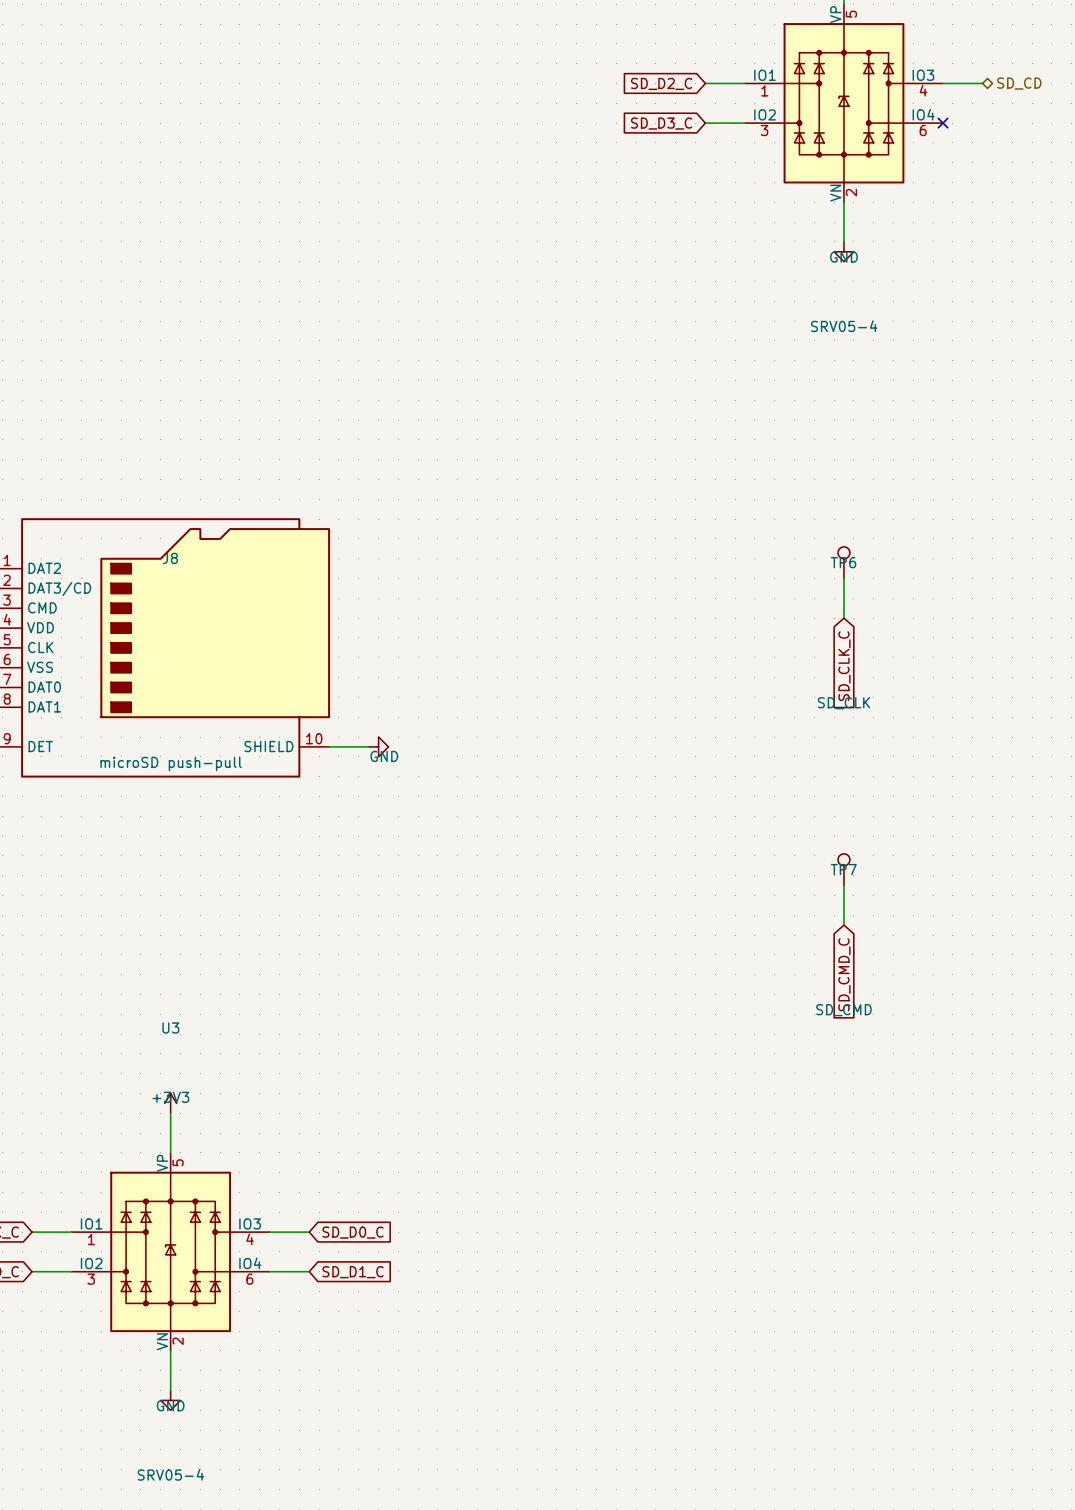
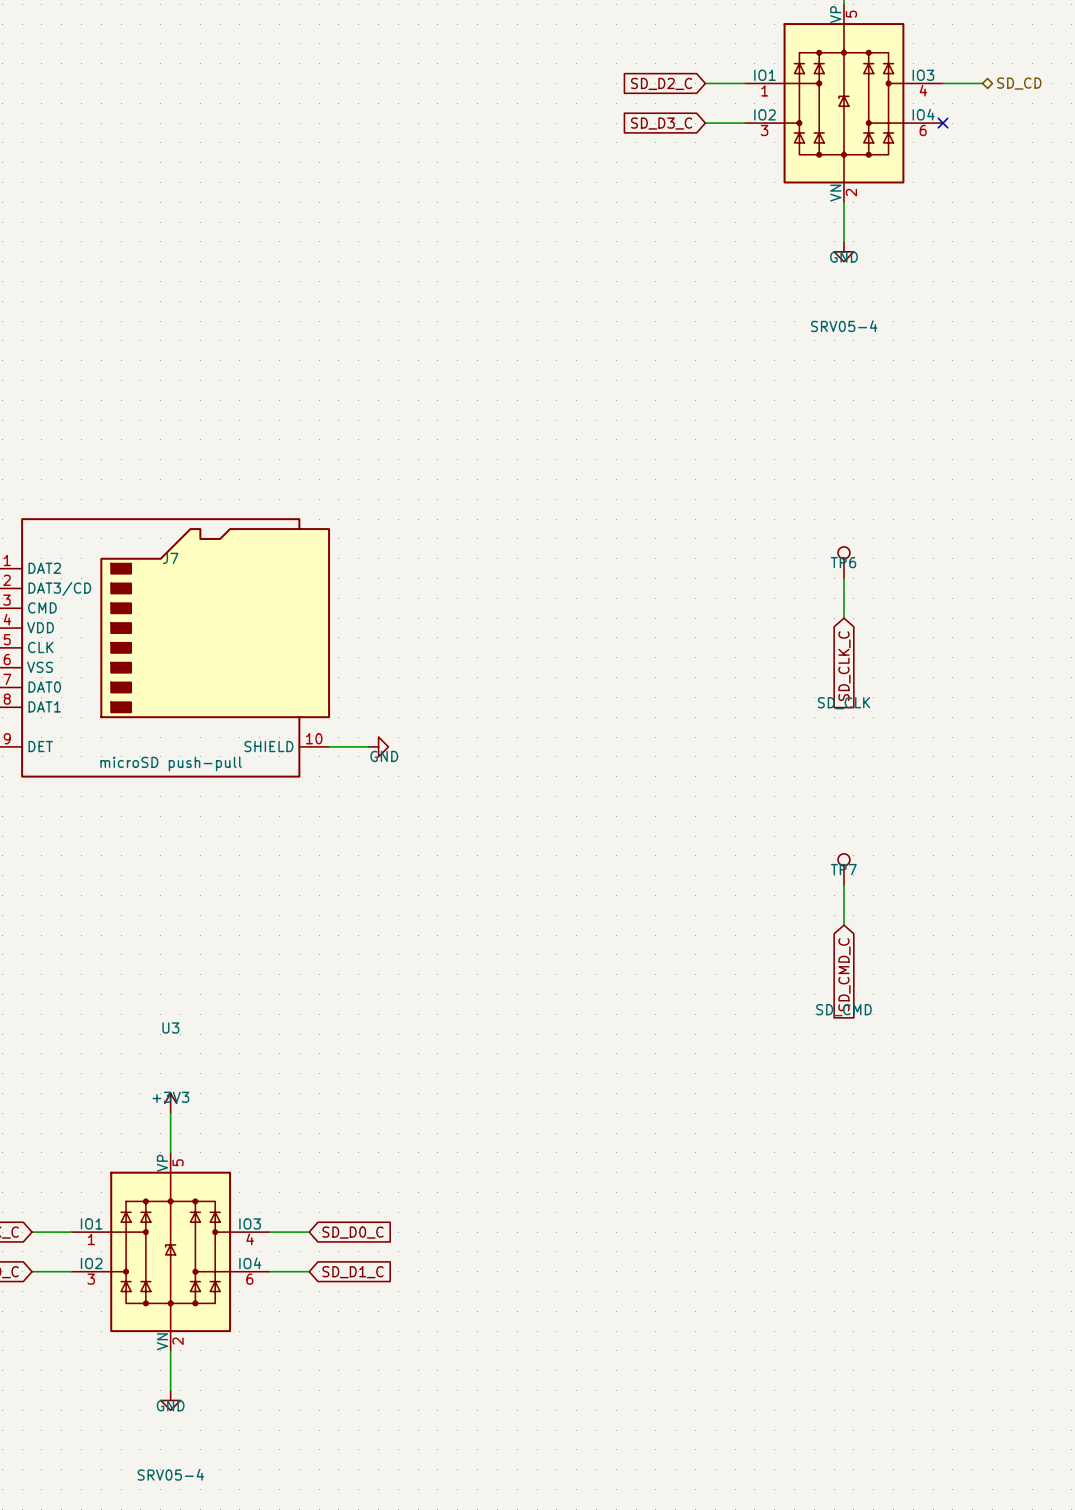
J8 name: J8 (170, 558) -> J7 (170, 558)

